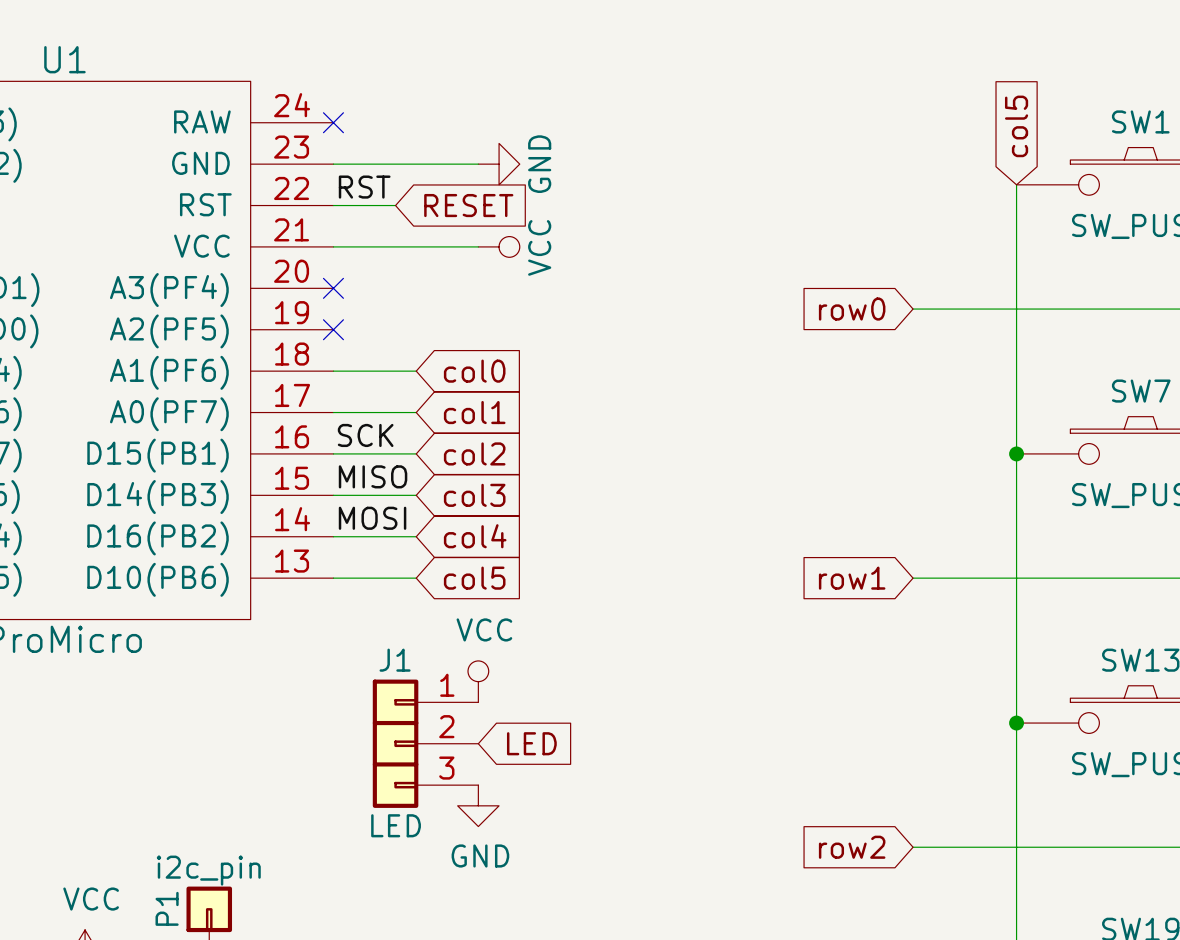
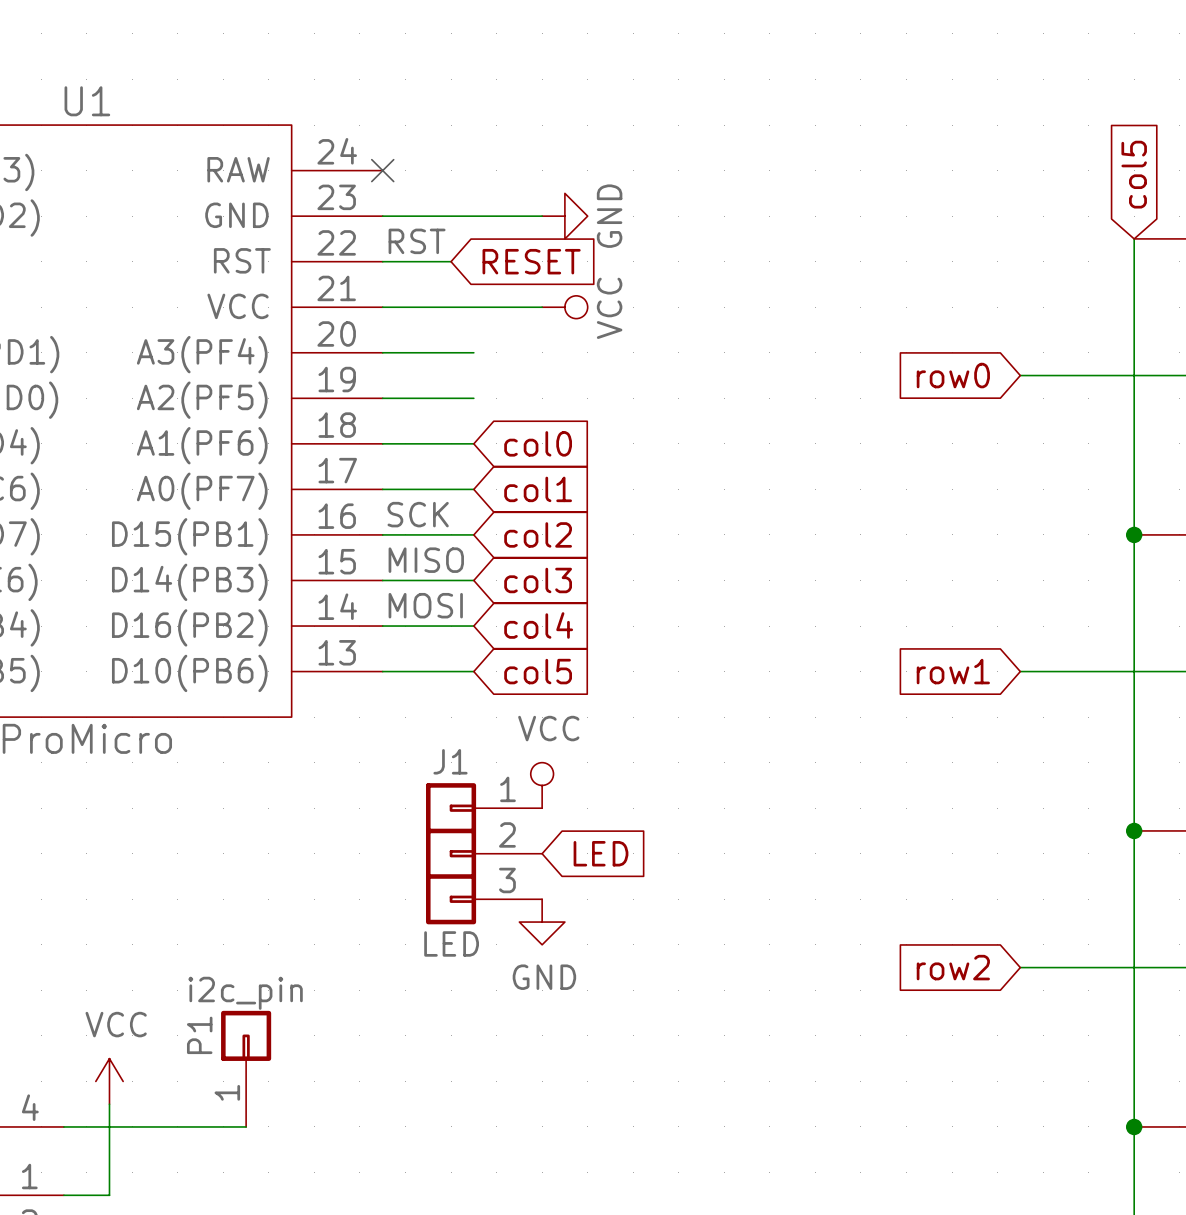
wire: none -> (382, 352) (473, 352)
no-connect mark: (333, 288) -> none
wire: none -> (382, 398) (473, 398)
no-connect mark: (333, 329) -> none

